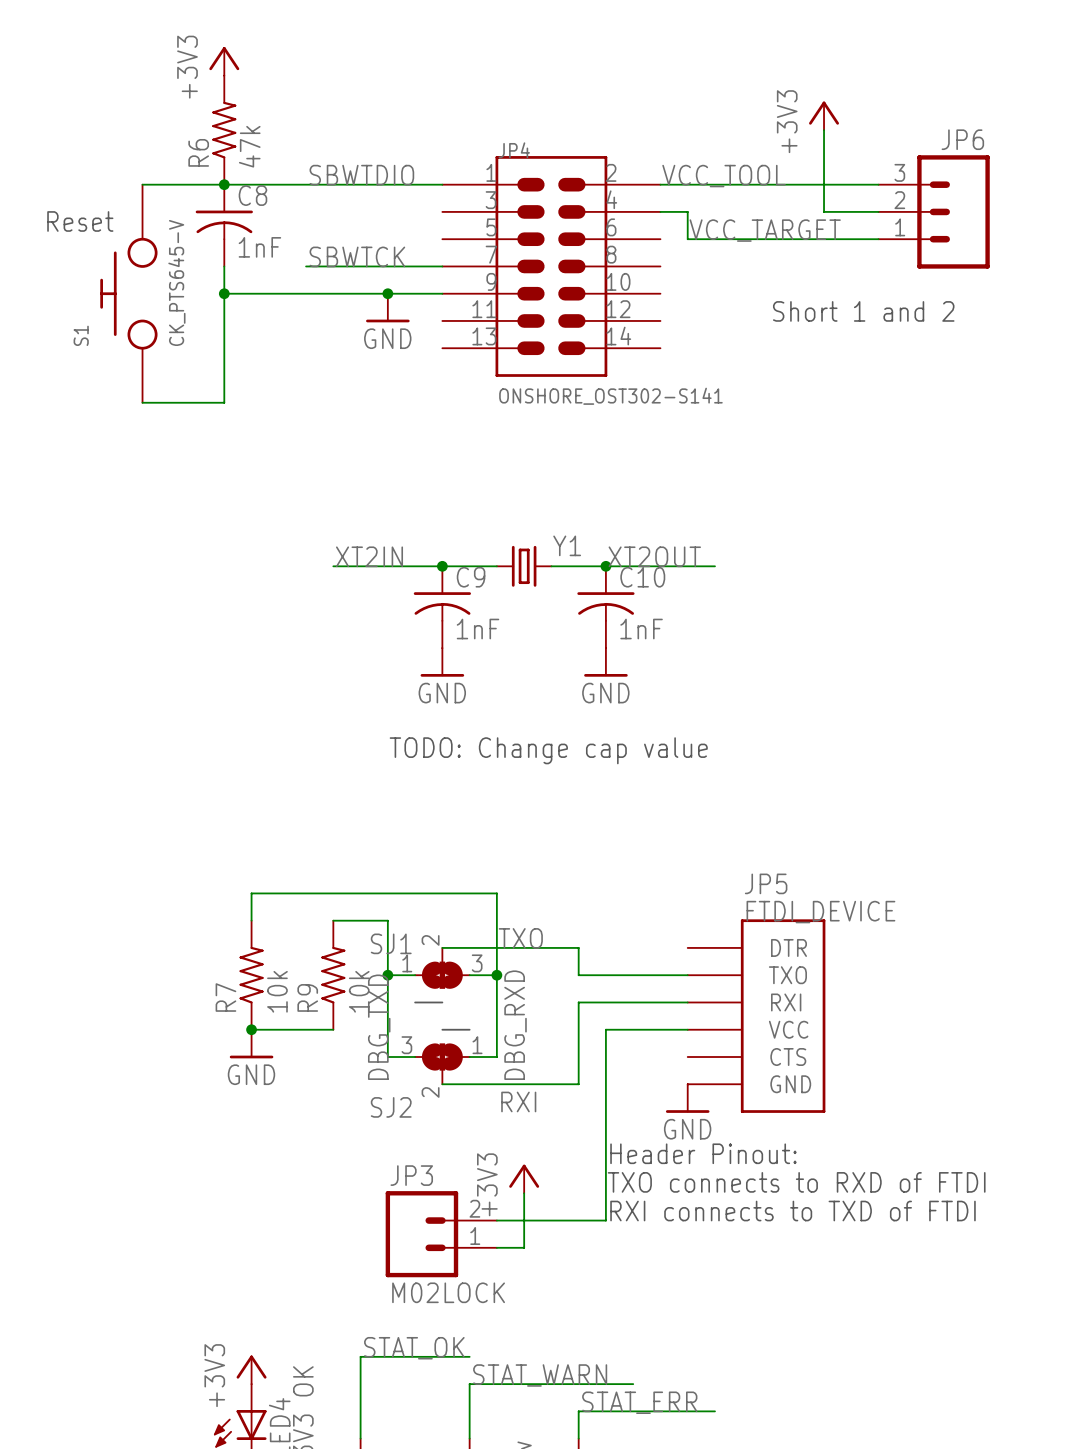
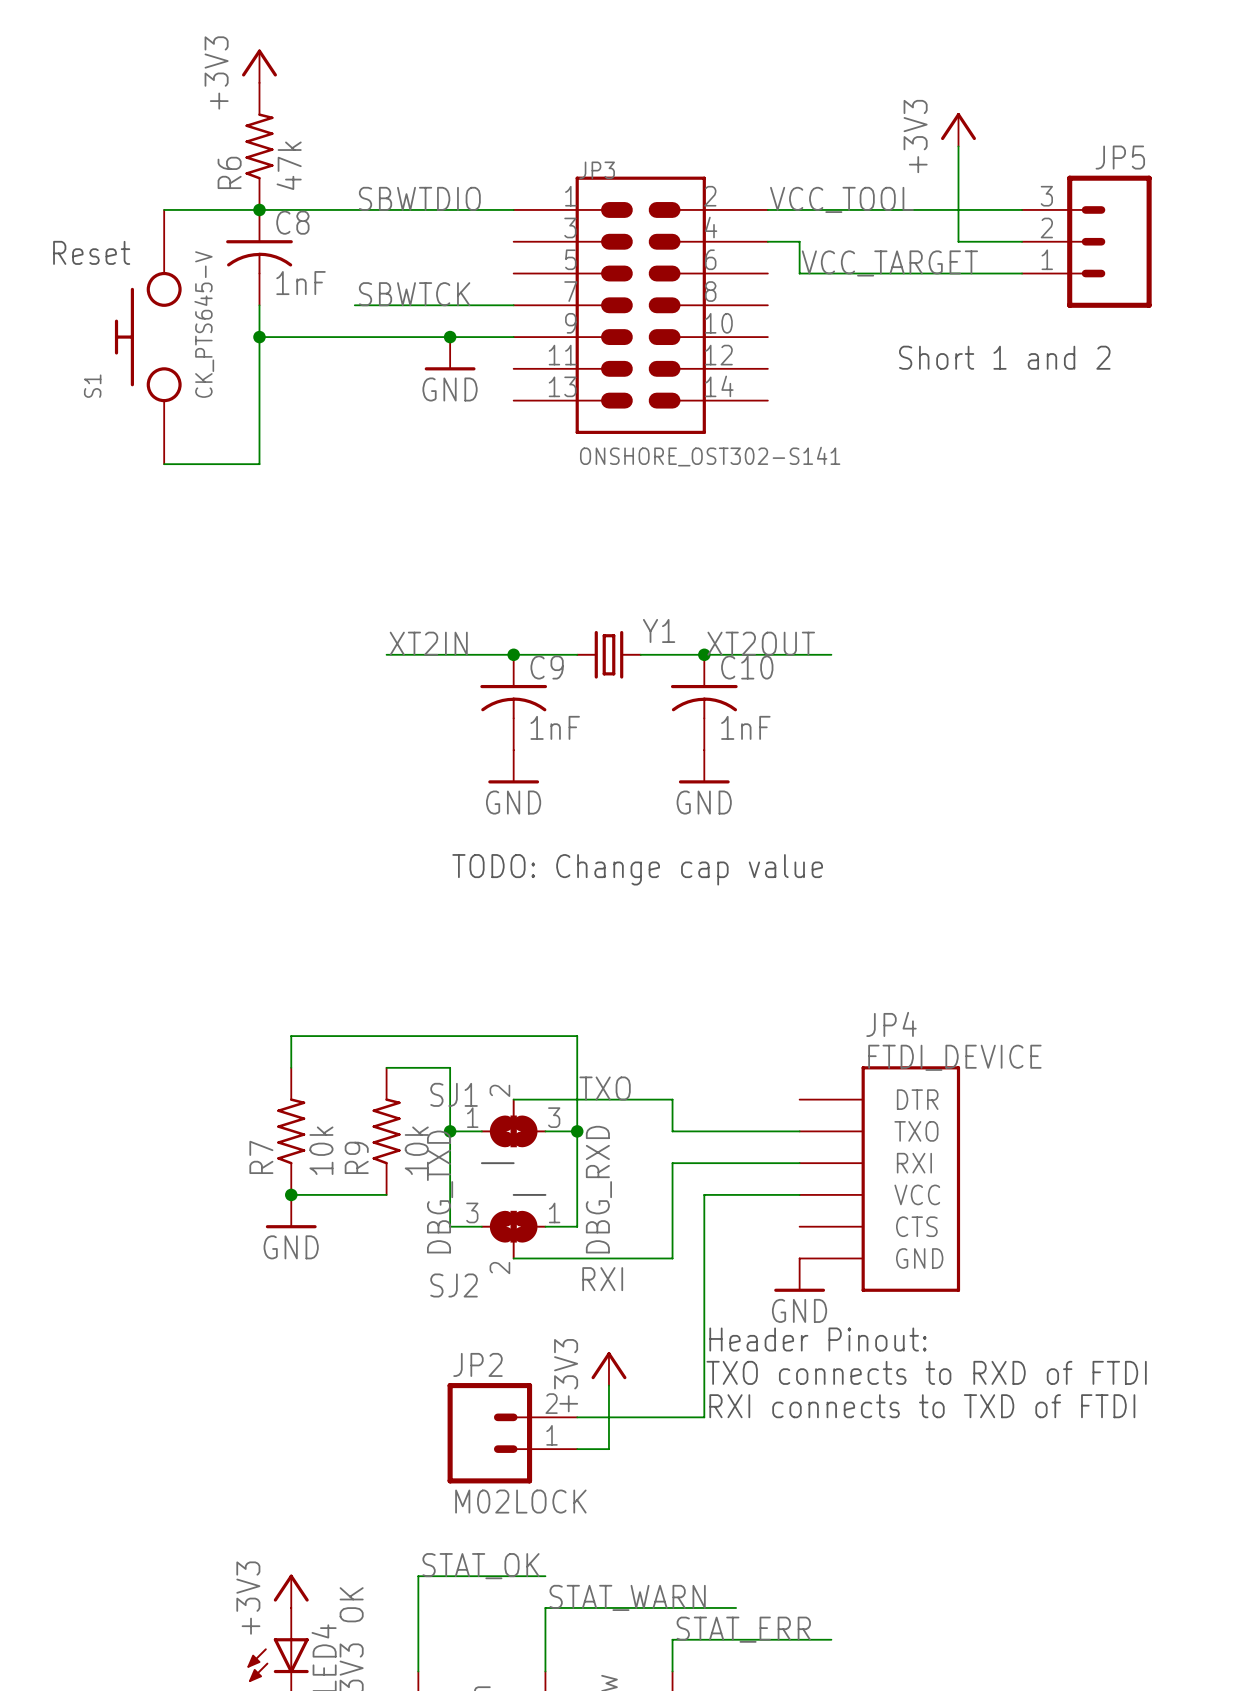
JP6 name: JP6 (962, 139) -> JP5 (1120, 157)
JP4 name: JP4 (514, 150) -> JP3 (597, 170)
JP5 name: JP5 (766, 883) -> JP4 (891, 1024)
JP3 name: JP3 (411, 1175) -> JP2 (477, 1364)

